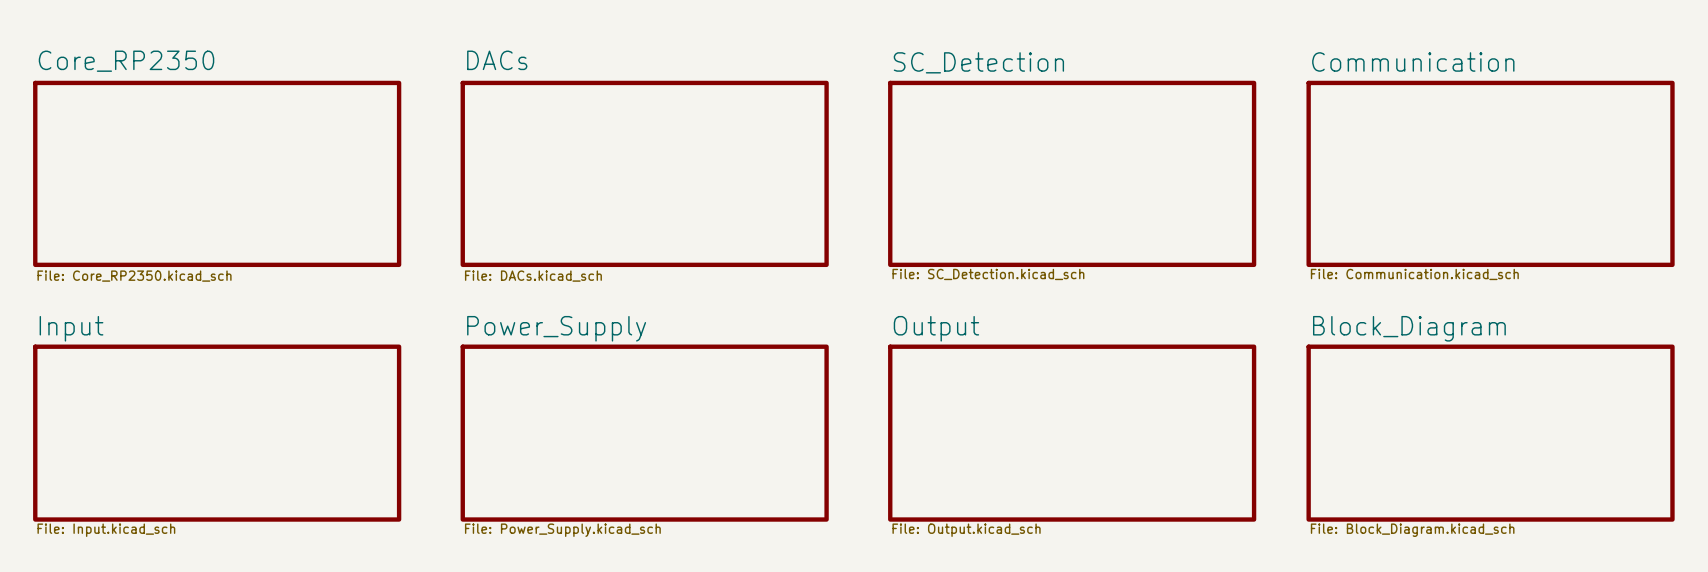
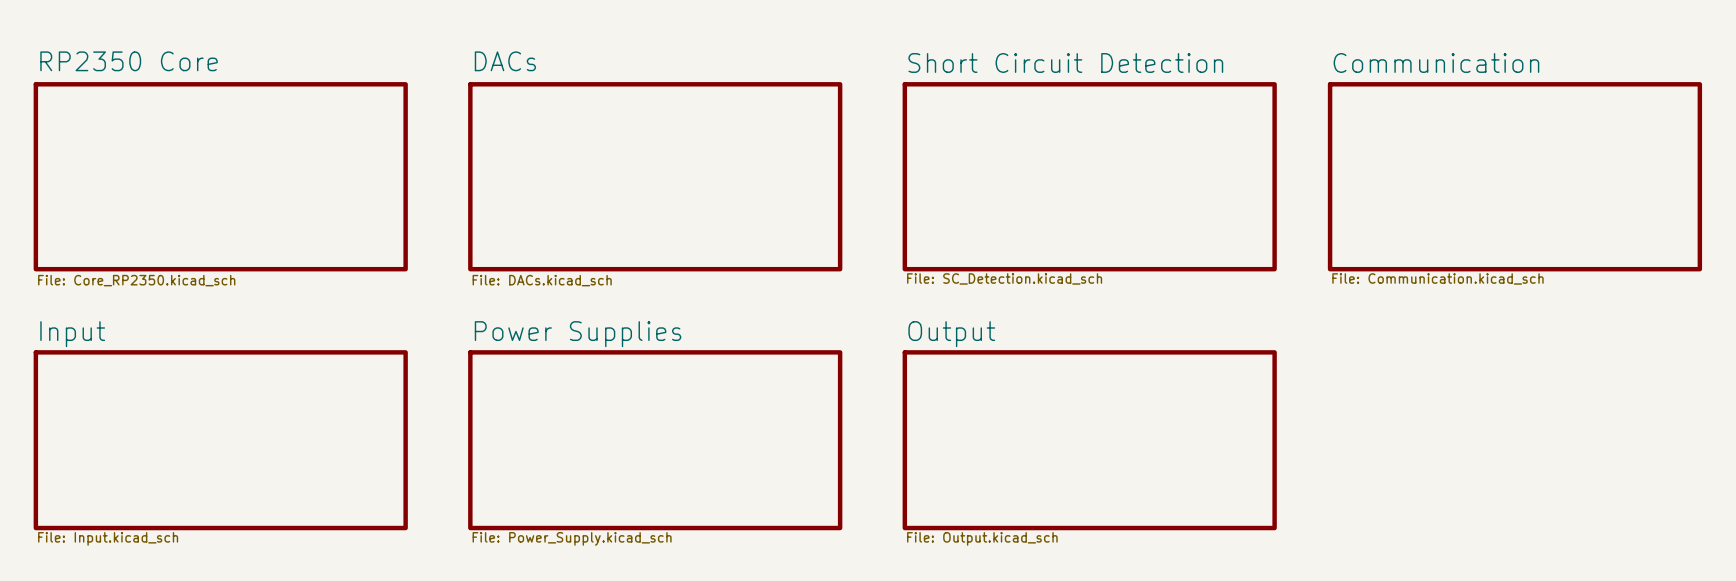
sheet Core_RP2350 name: Core_RP2350 (126, 61) -> RP2350 Core (129, 61)
sheet SC_Detection name: SC_Detection (978, 62) -> Short Circuit Detection (1065, 62)
sheet Power_Supply name: Power_Supply (556, 328) -> Power Supplies (578, 334)
sheet Block_Diagram: File: Block_Diagram.kicad_sch (1490, 433) -> none

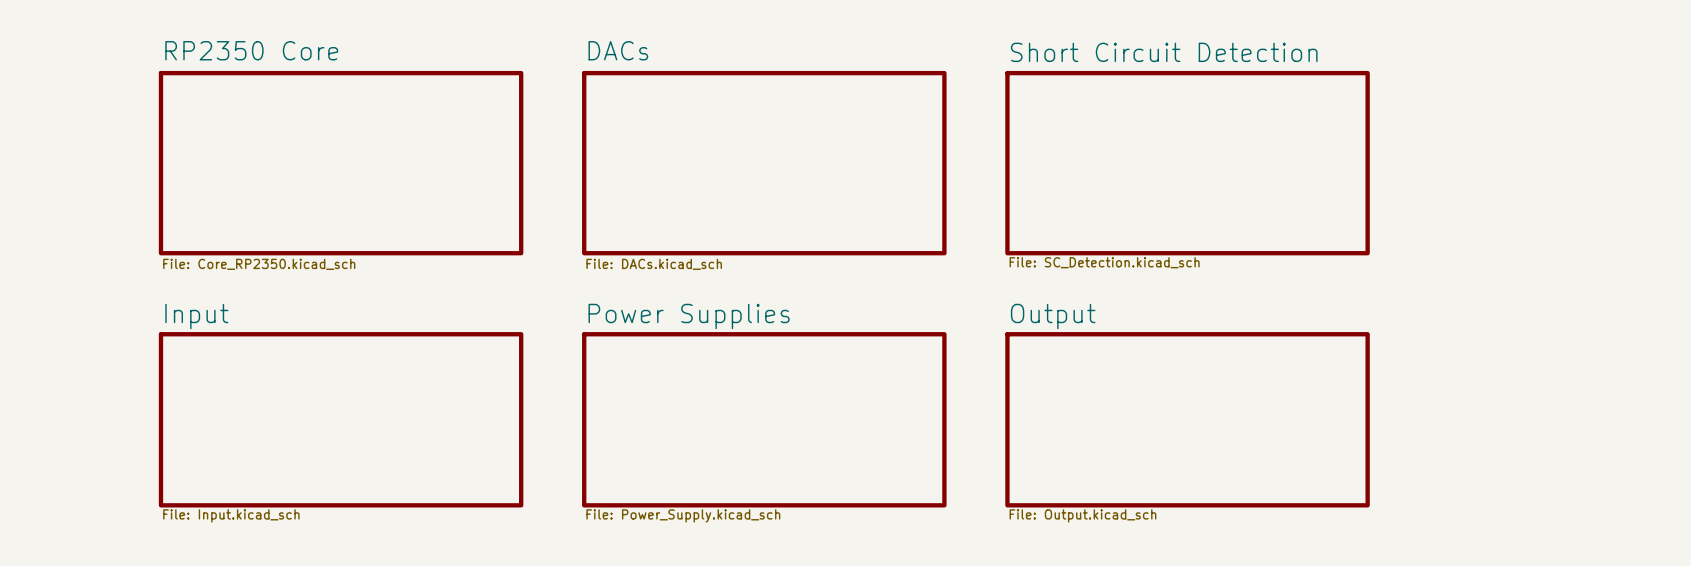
sheet RP2350 Core position: (220, 176) -> (341, 163)
sheet DACs position: (655, 176) -> (764, 163)
sheet Short Circuit Detection position: (1089, 176) -> (1187, 163)
sheet Communication: File: Communication.kicad_sch (1514, 176) -> none
sheet Input position: (220, 440) -> (341, 419)
sheet Power Supplies position: (655, 440) -> (764, 419)
sheet Output position: (1089, 440) -> (1187, 419)

